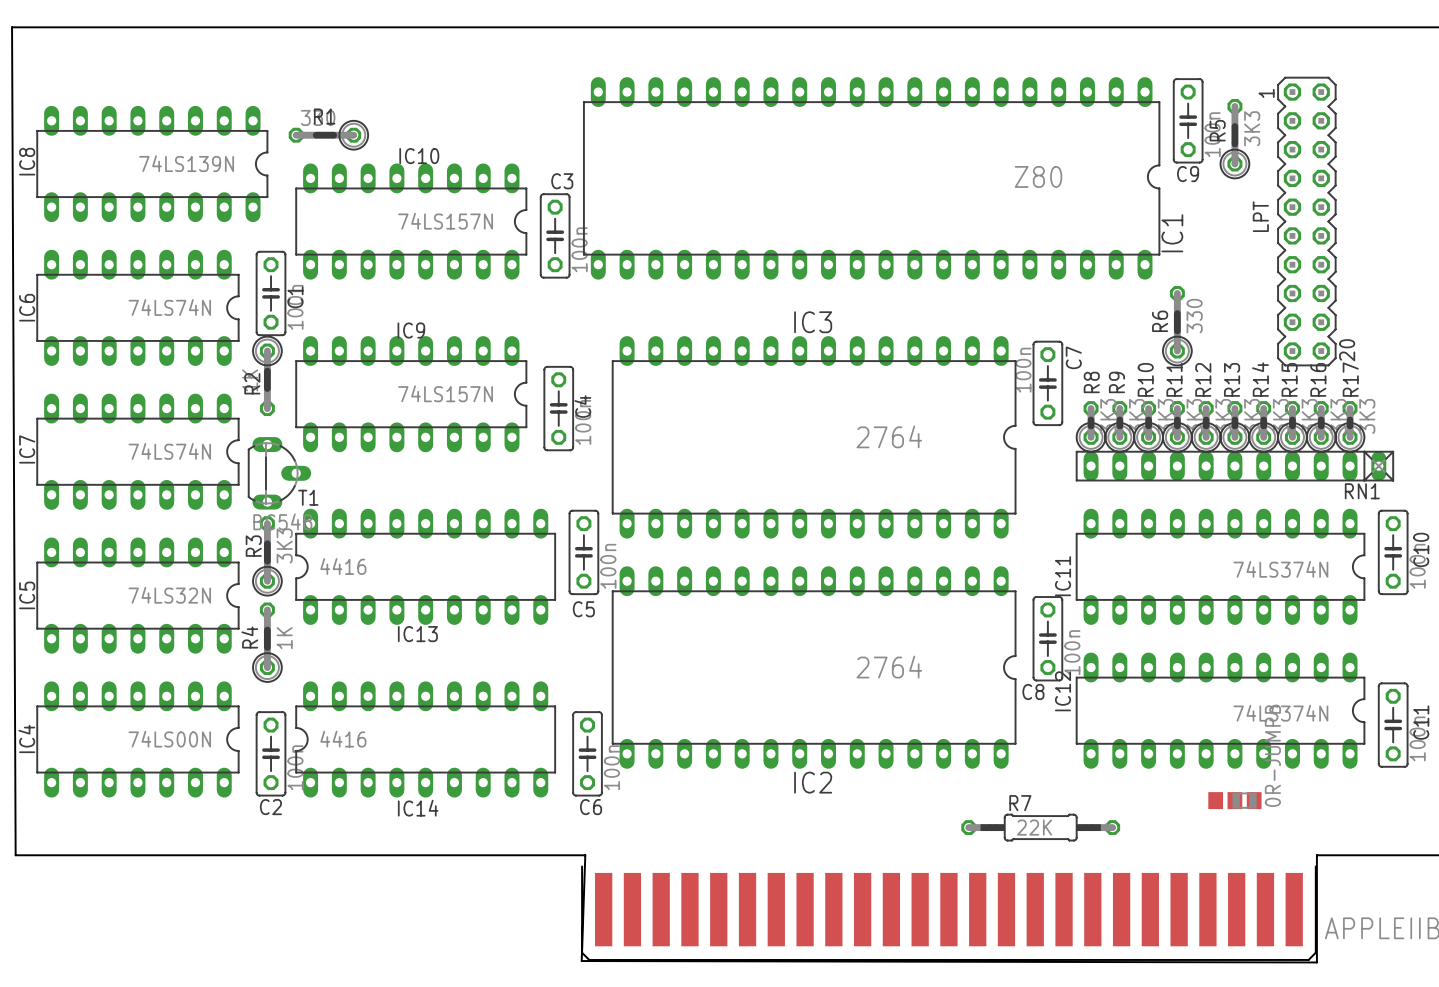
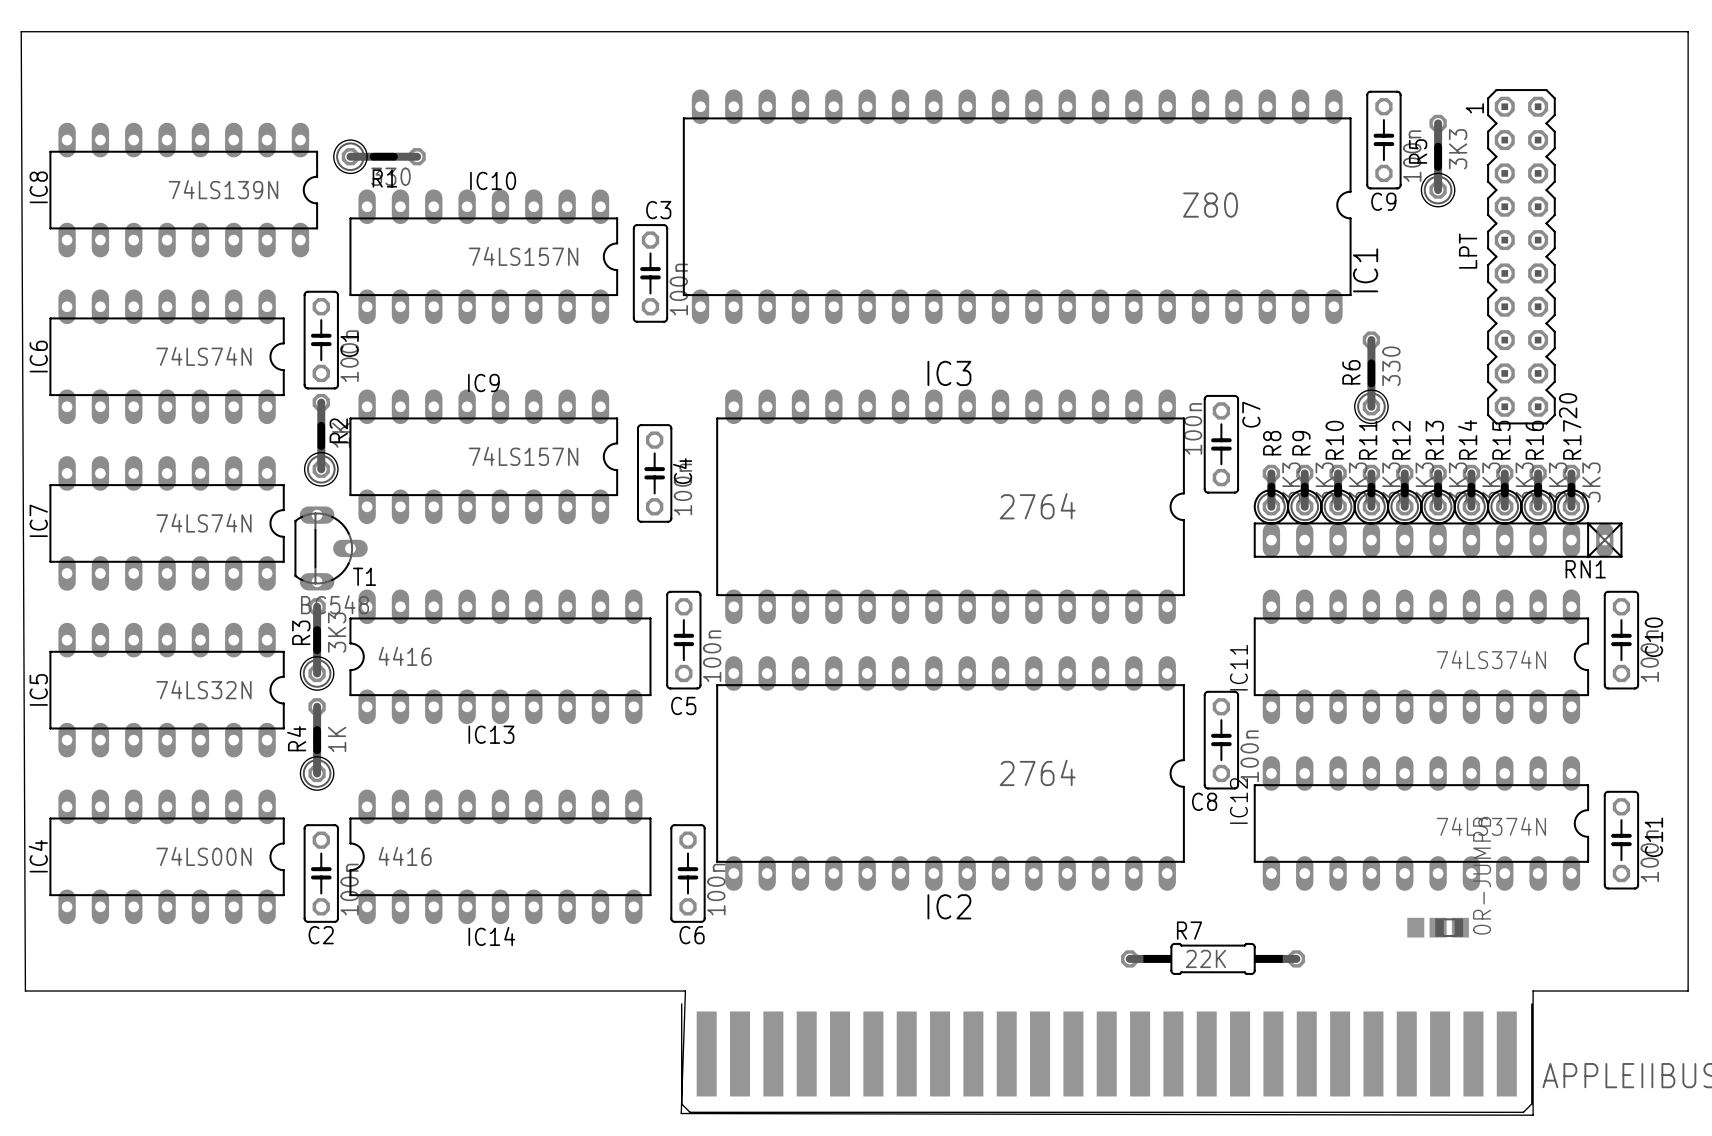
R1 rotation: 0° (328, 135) -> 180° (379, 156)
R2 rotation: 0° (267, 376) -> 180° (321, 440)

